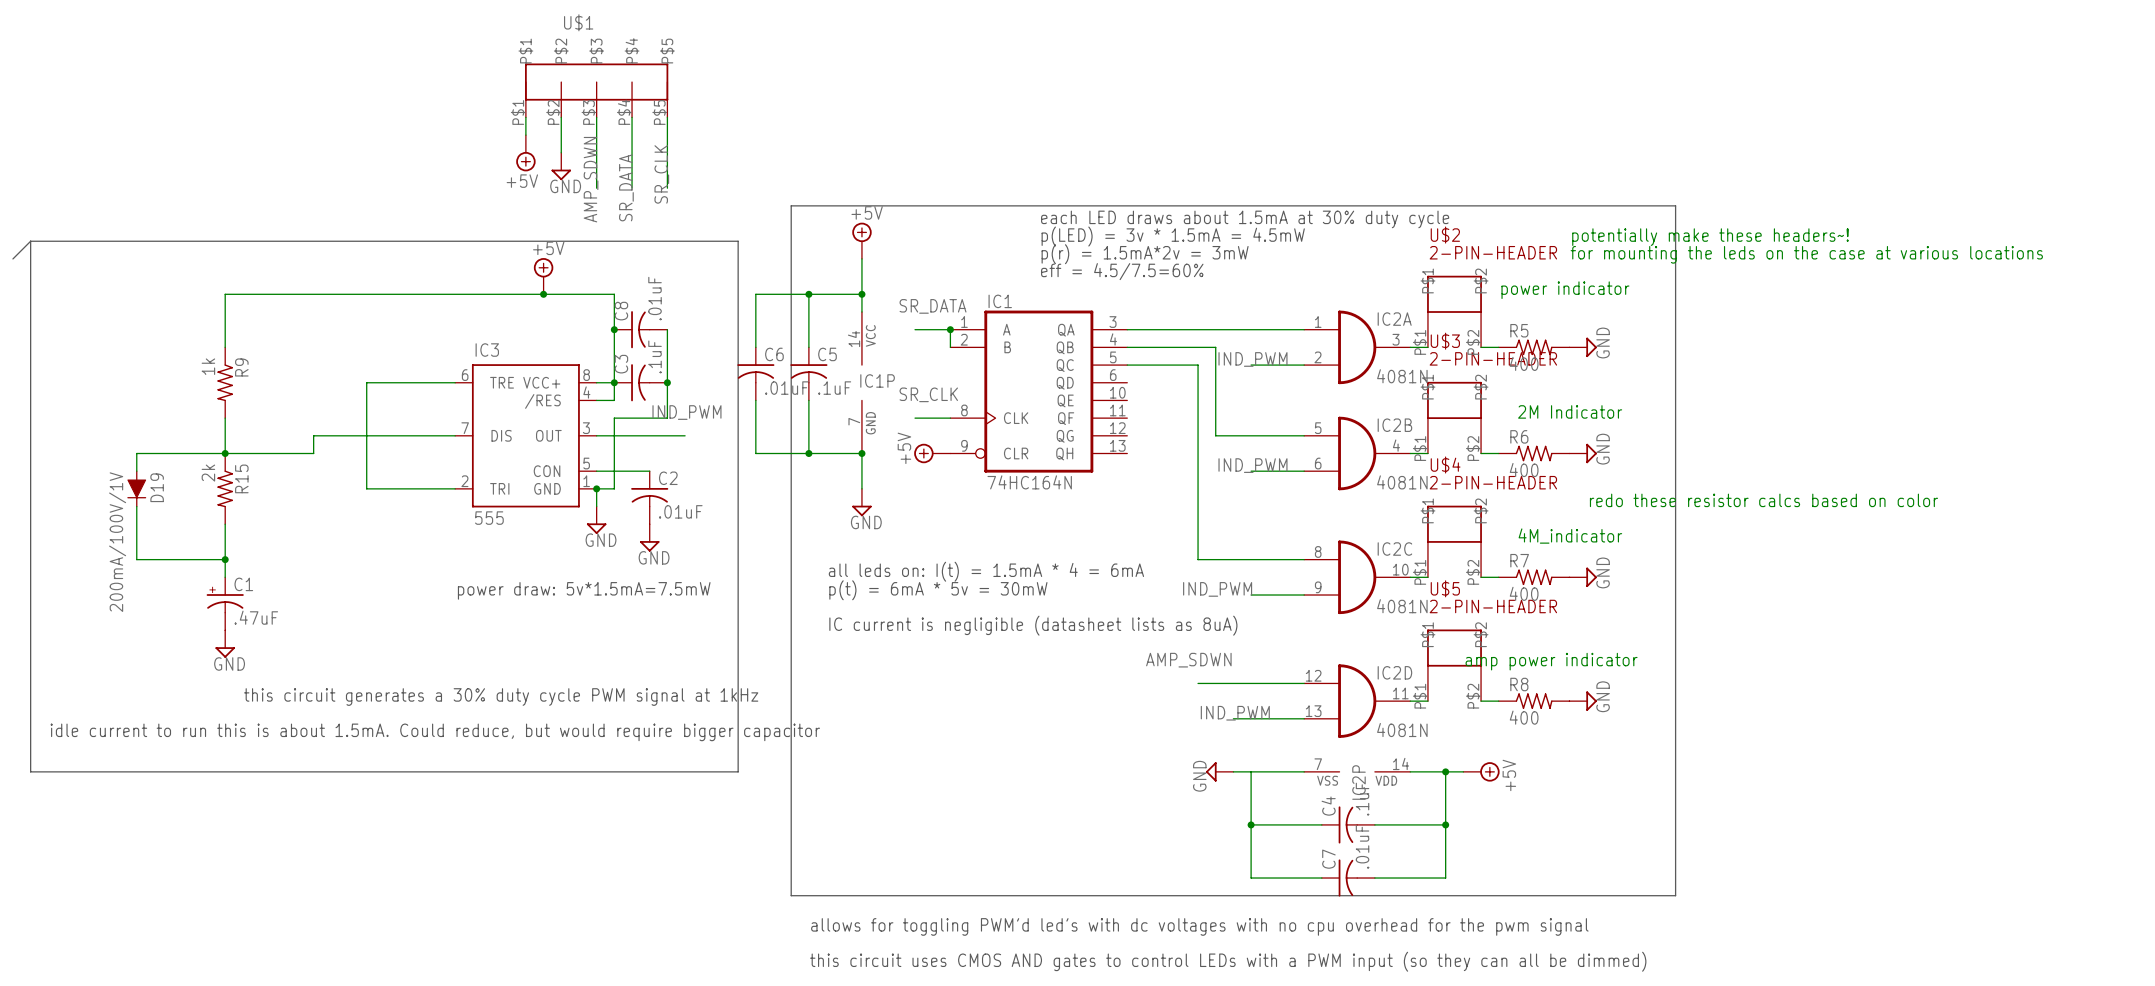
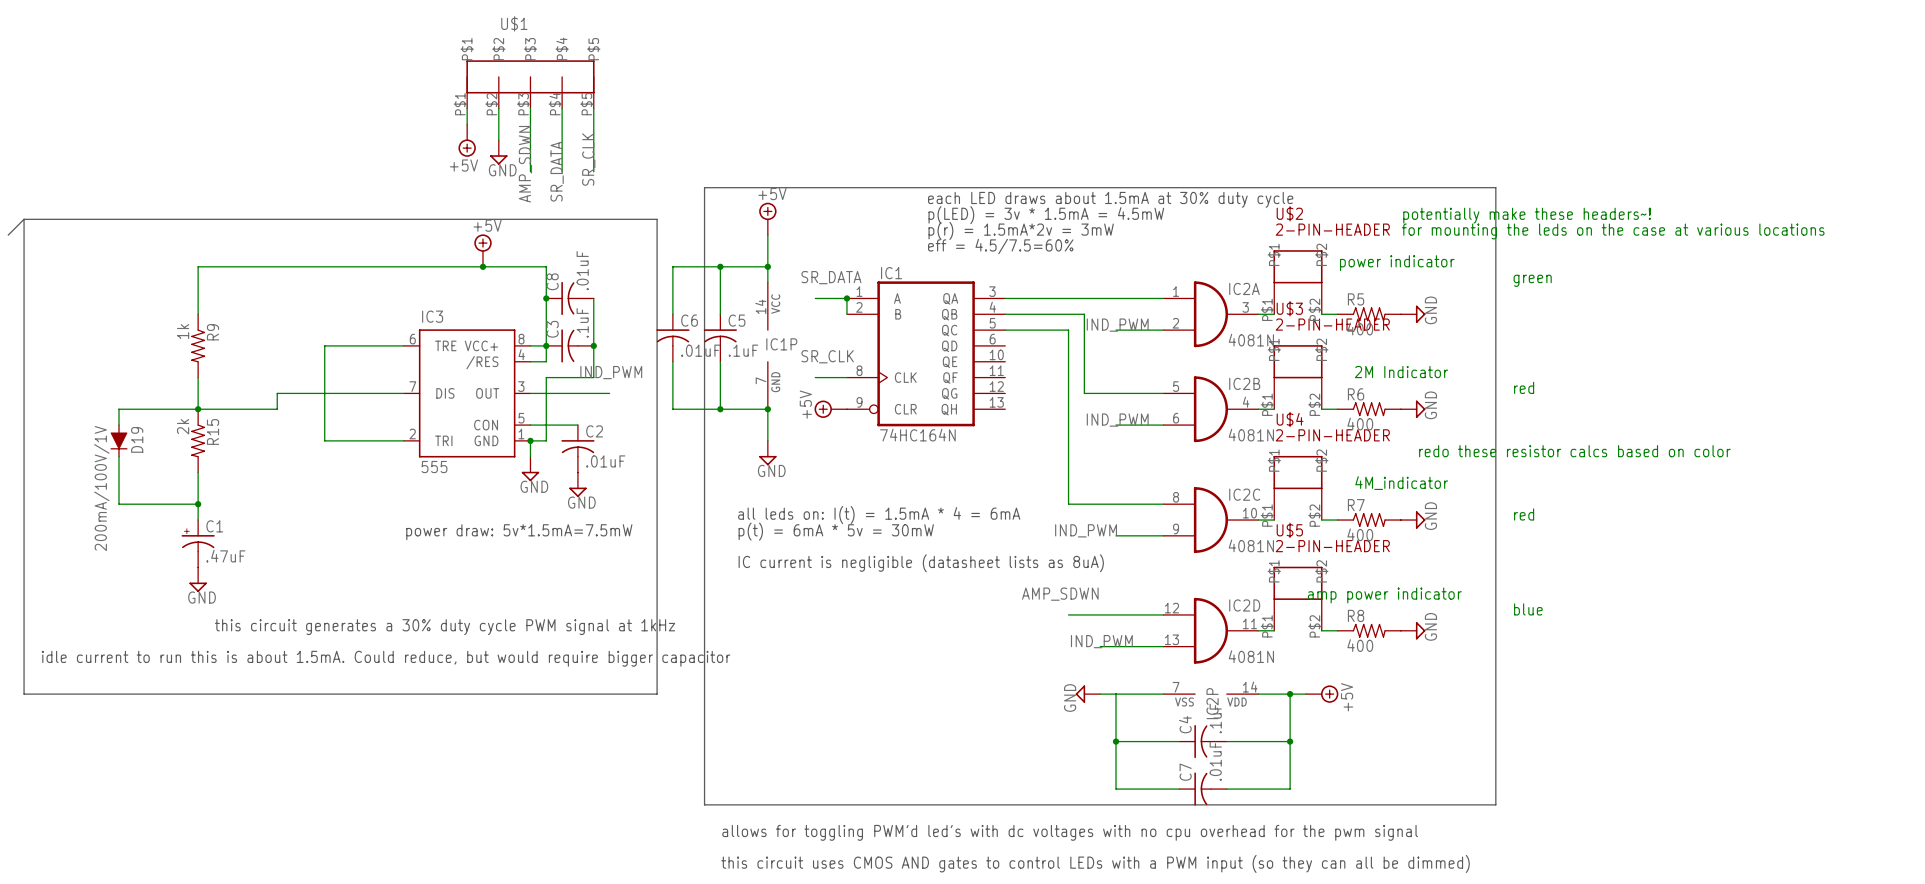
text: none -> green (1532, 280)
text: none -> red (1524, 387)
text: none -> red (1524, 514)
text: none -> blue (1528, 609)

